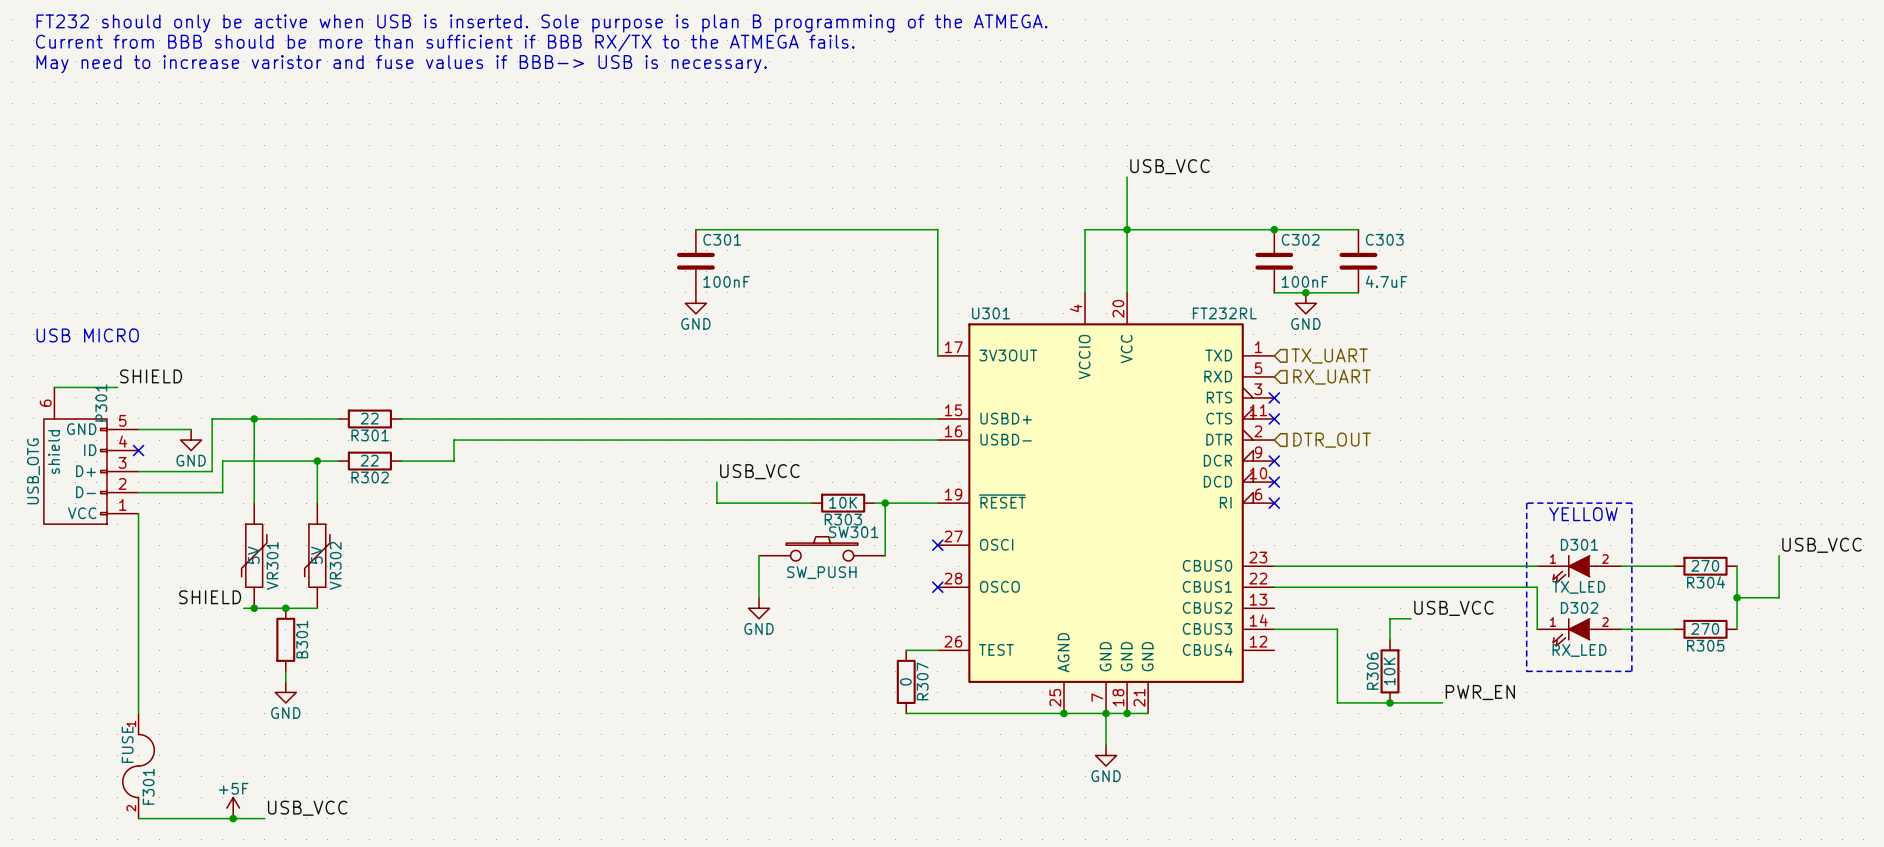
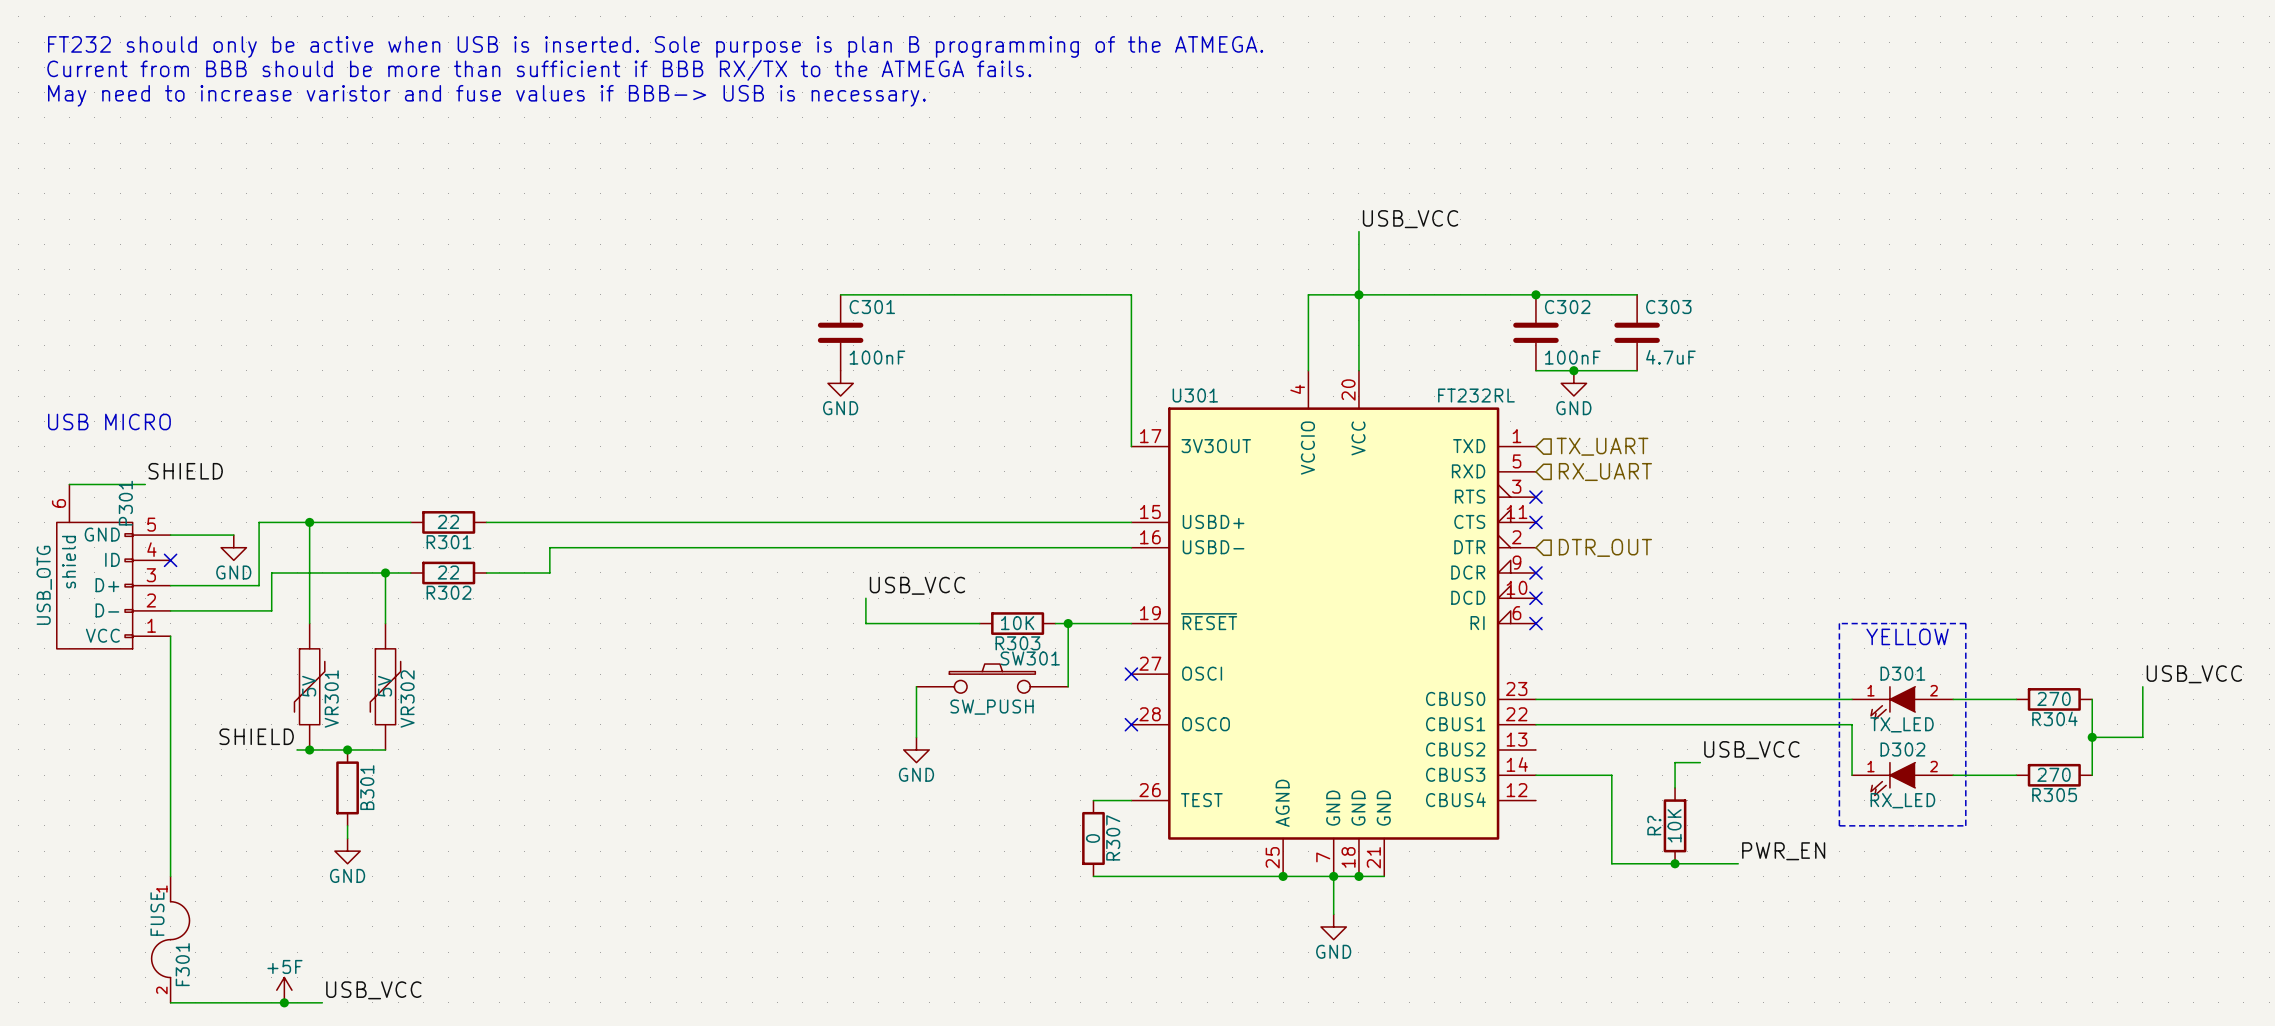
R306 name: R306 (1372, 671) -> R? (1654, 825)

